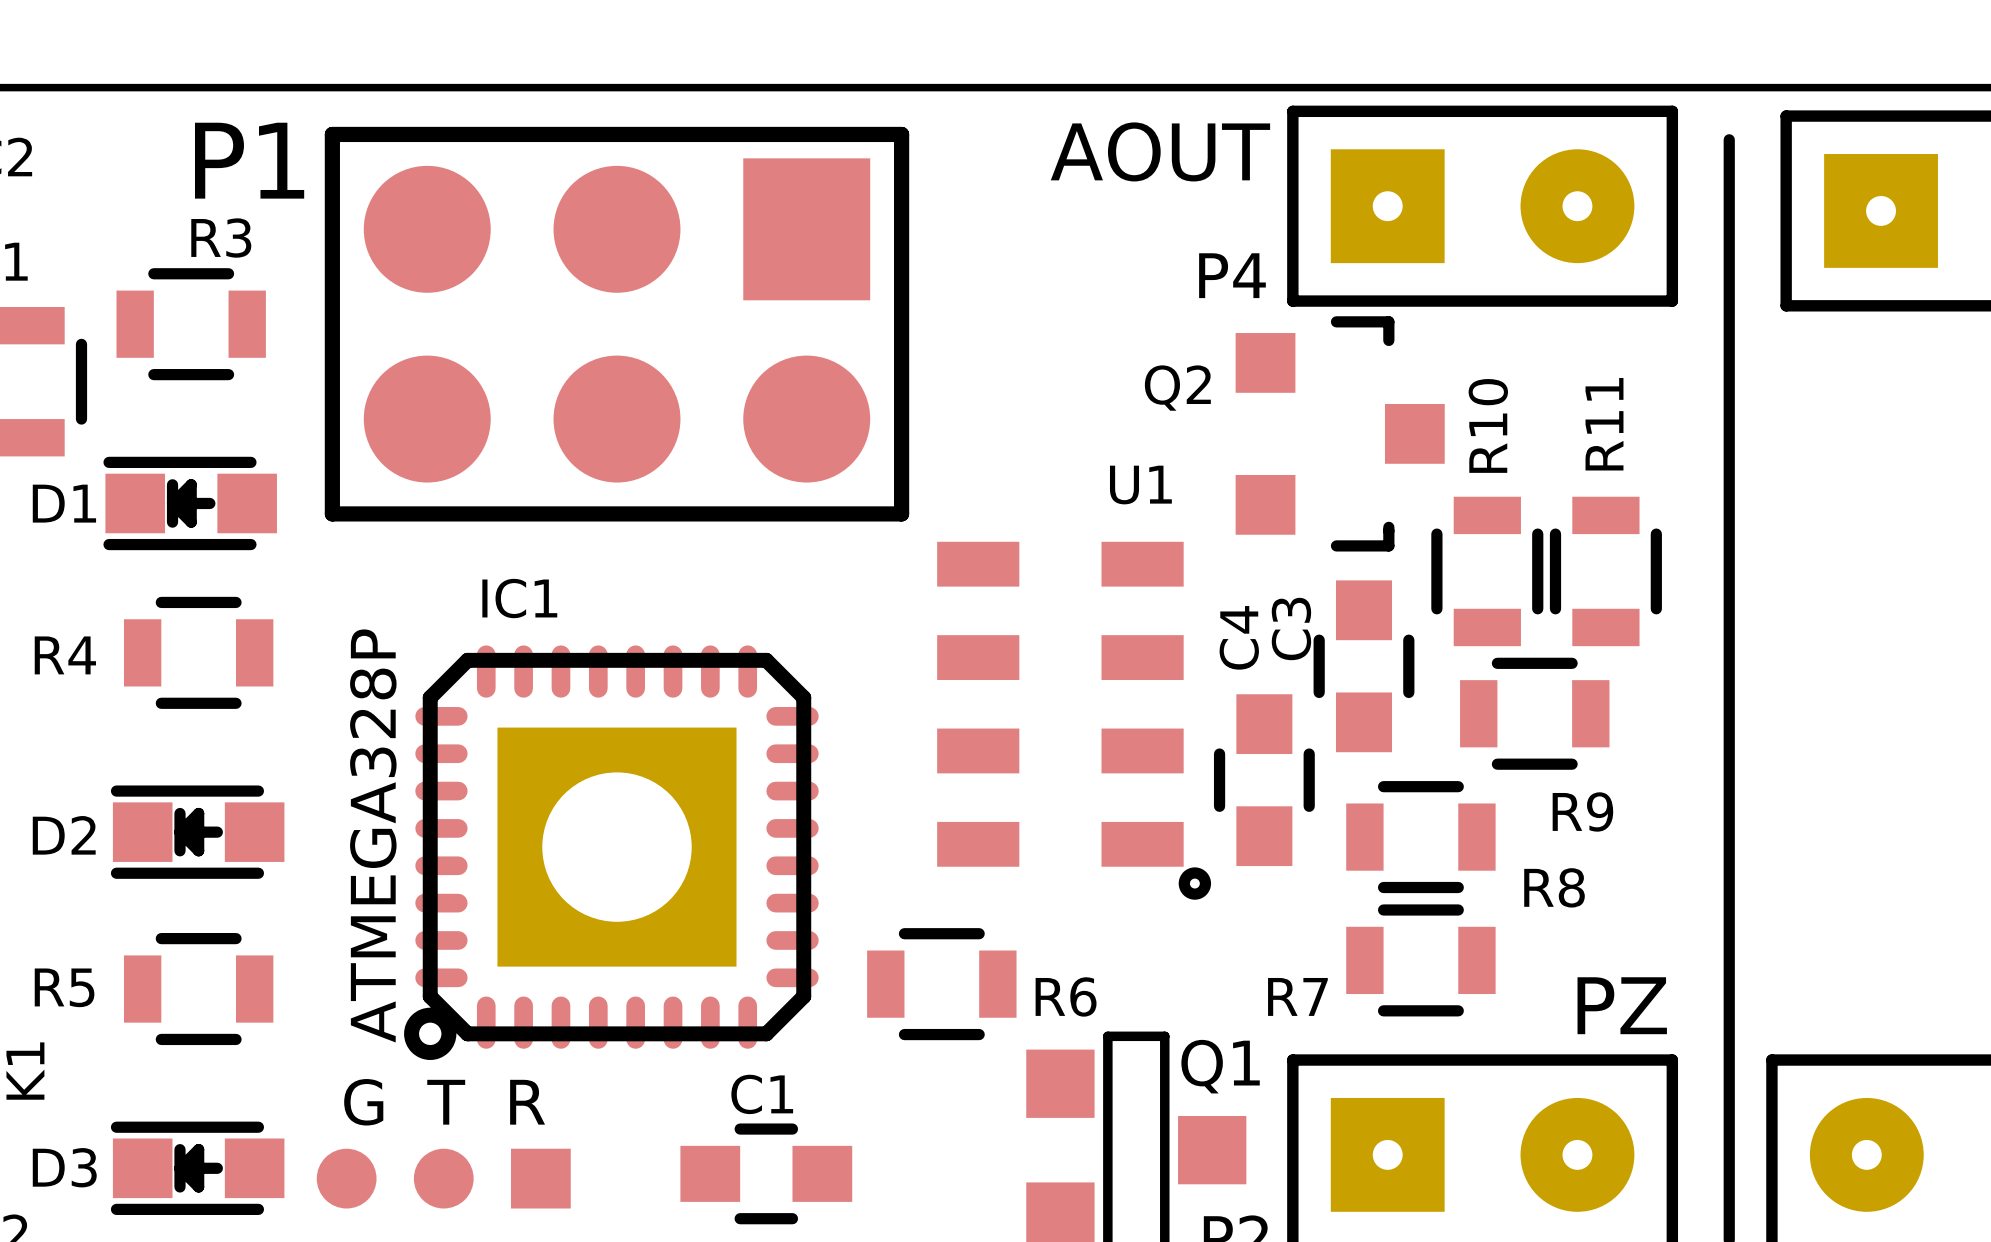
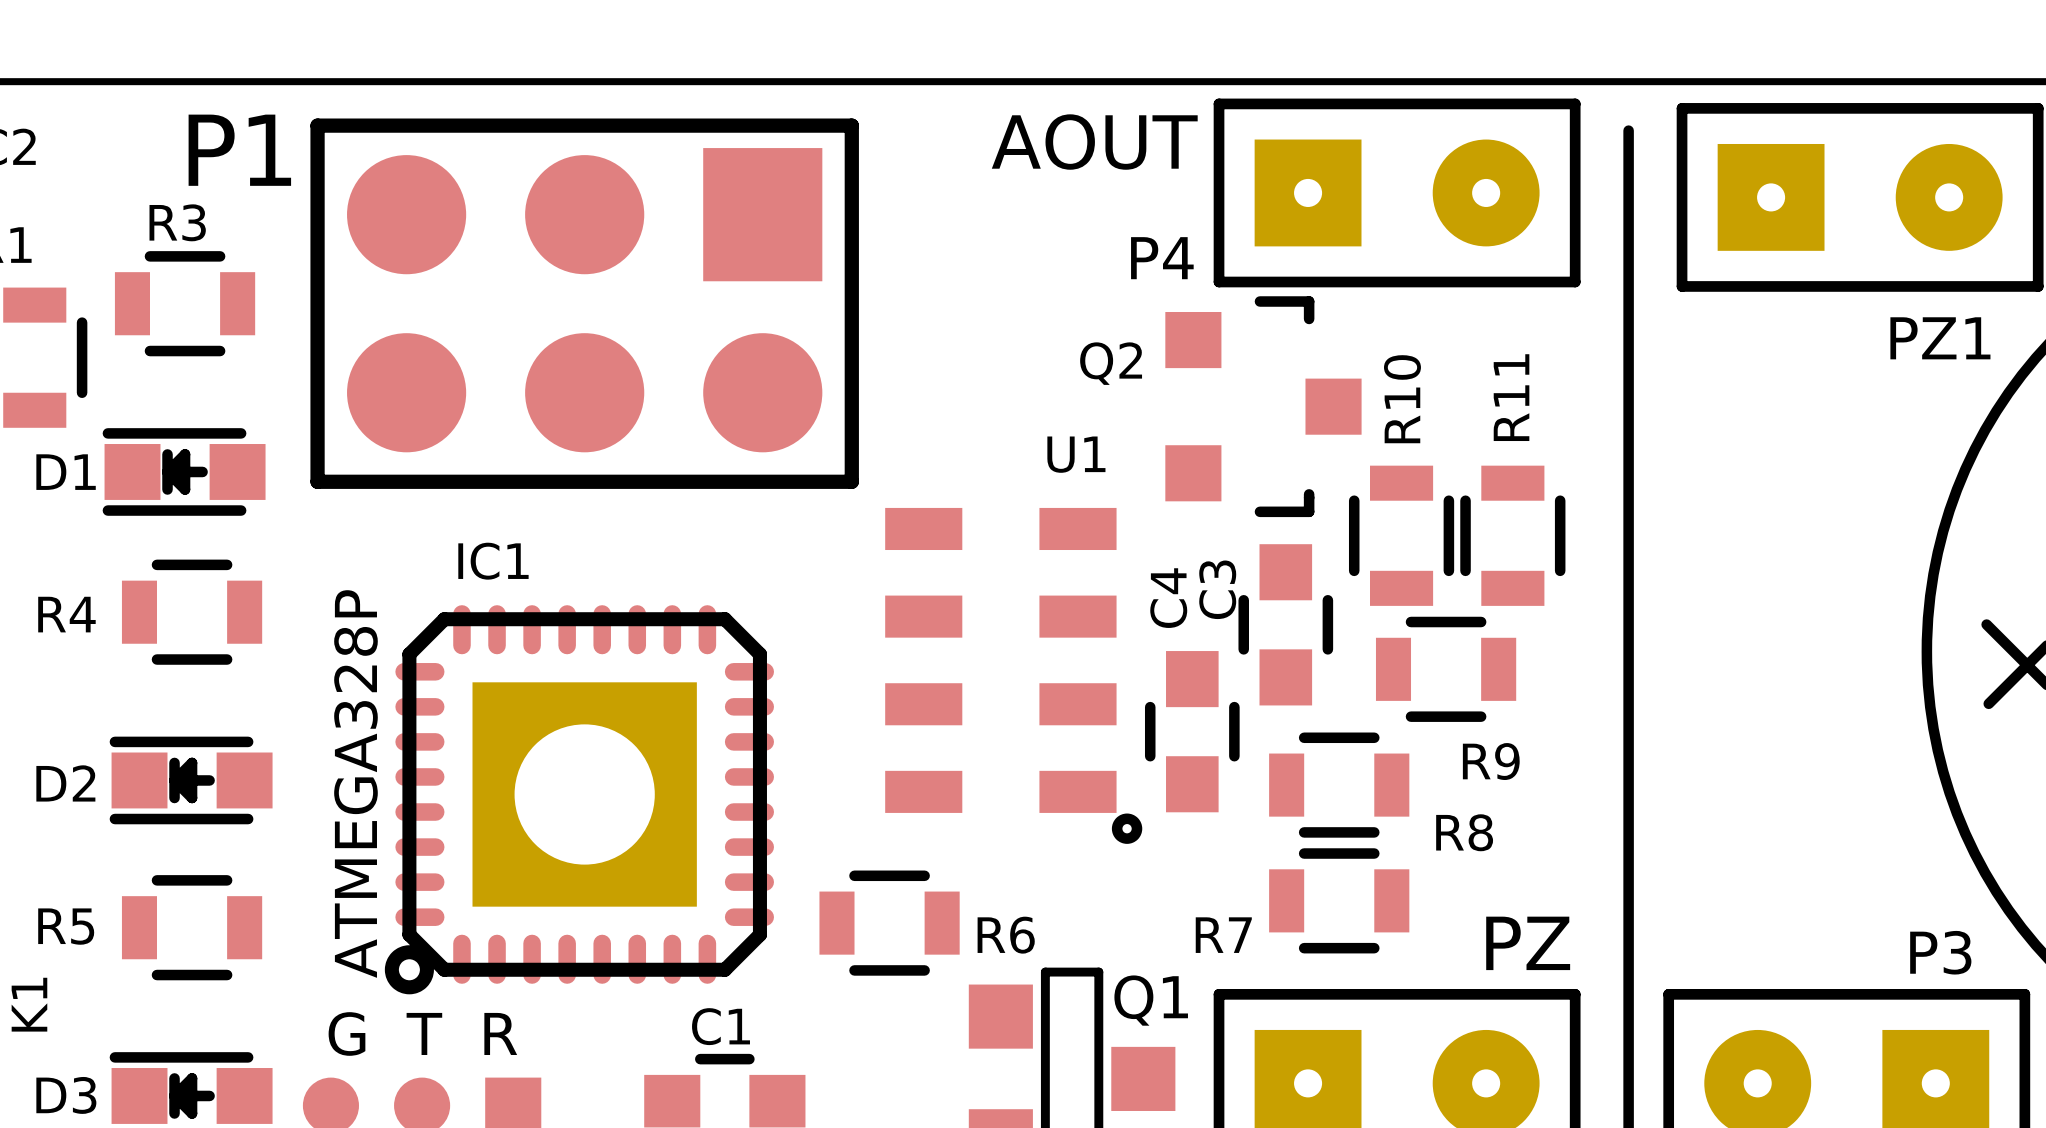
R3 name position: R3 (221, 238) -> R3 (177, 222)

